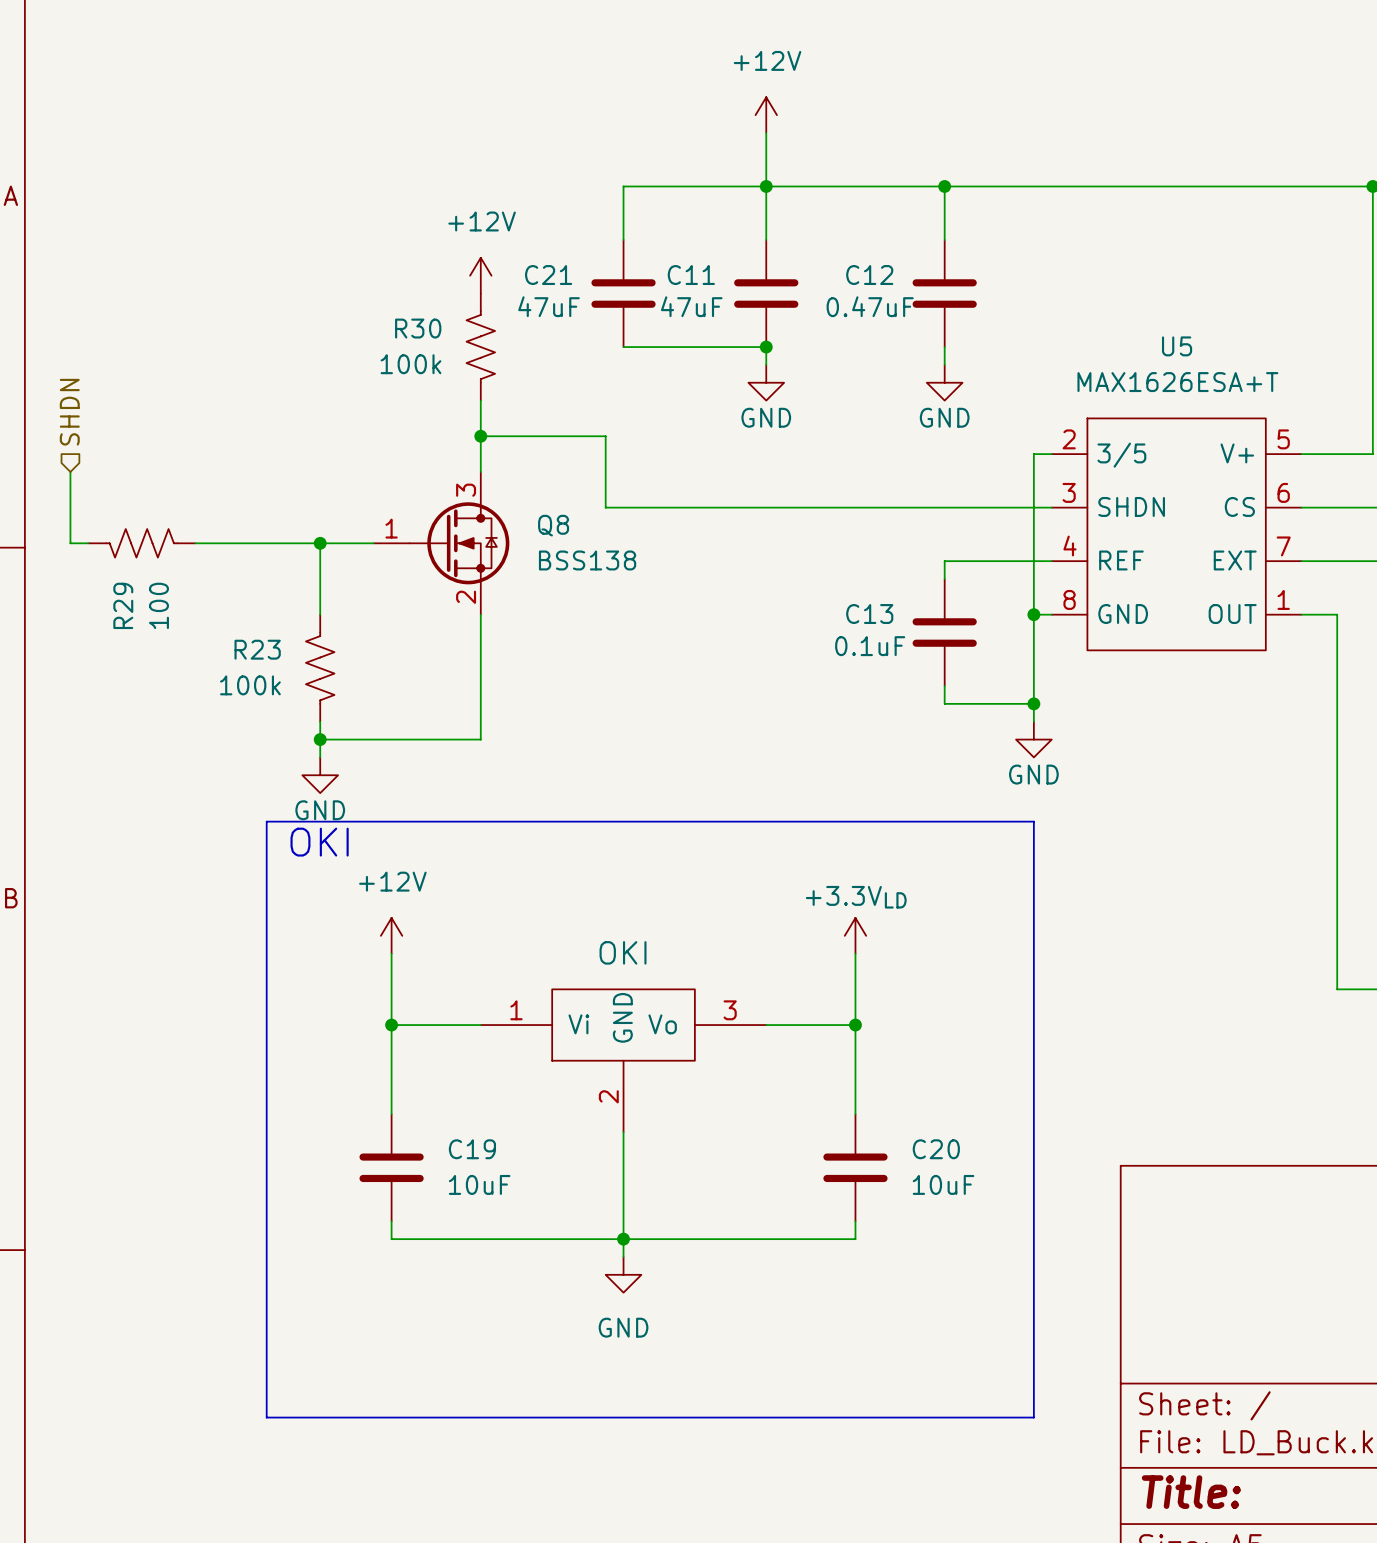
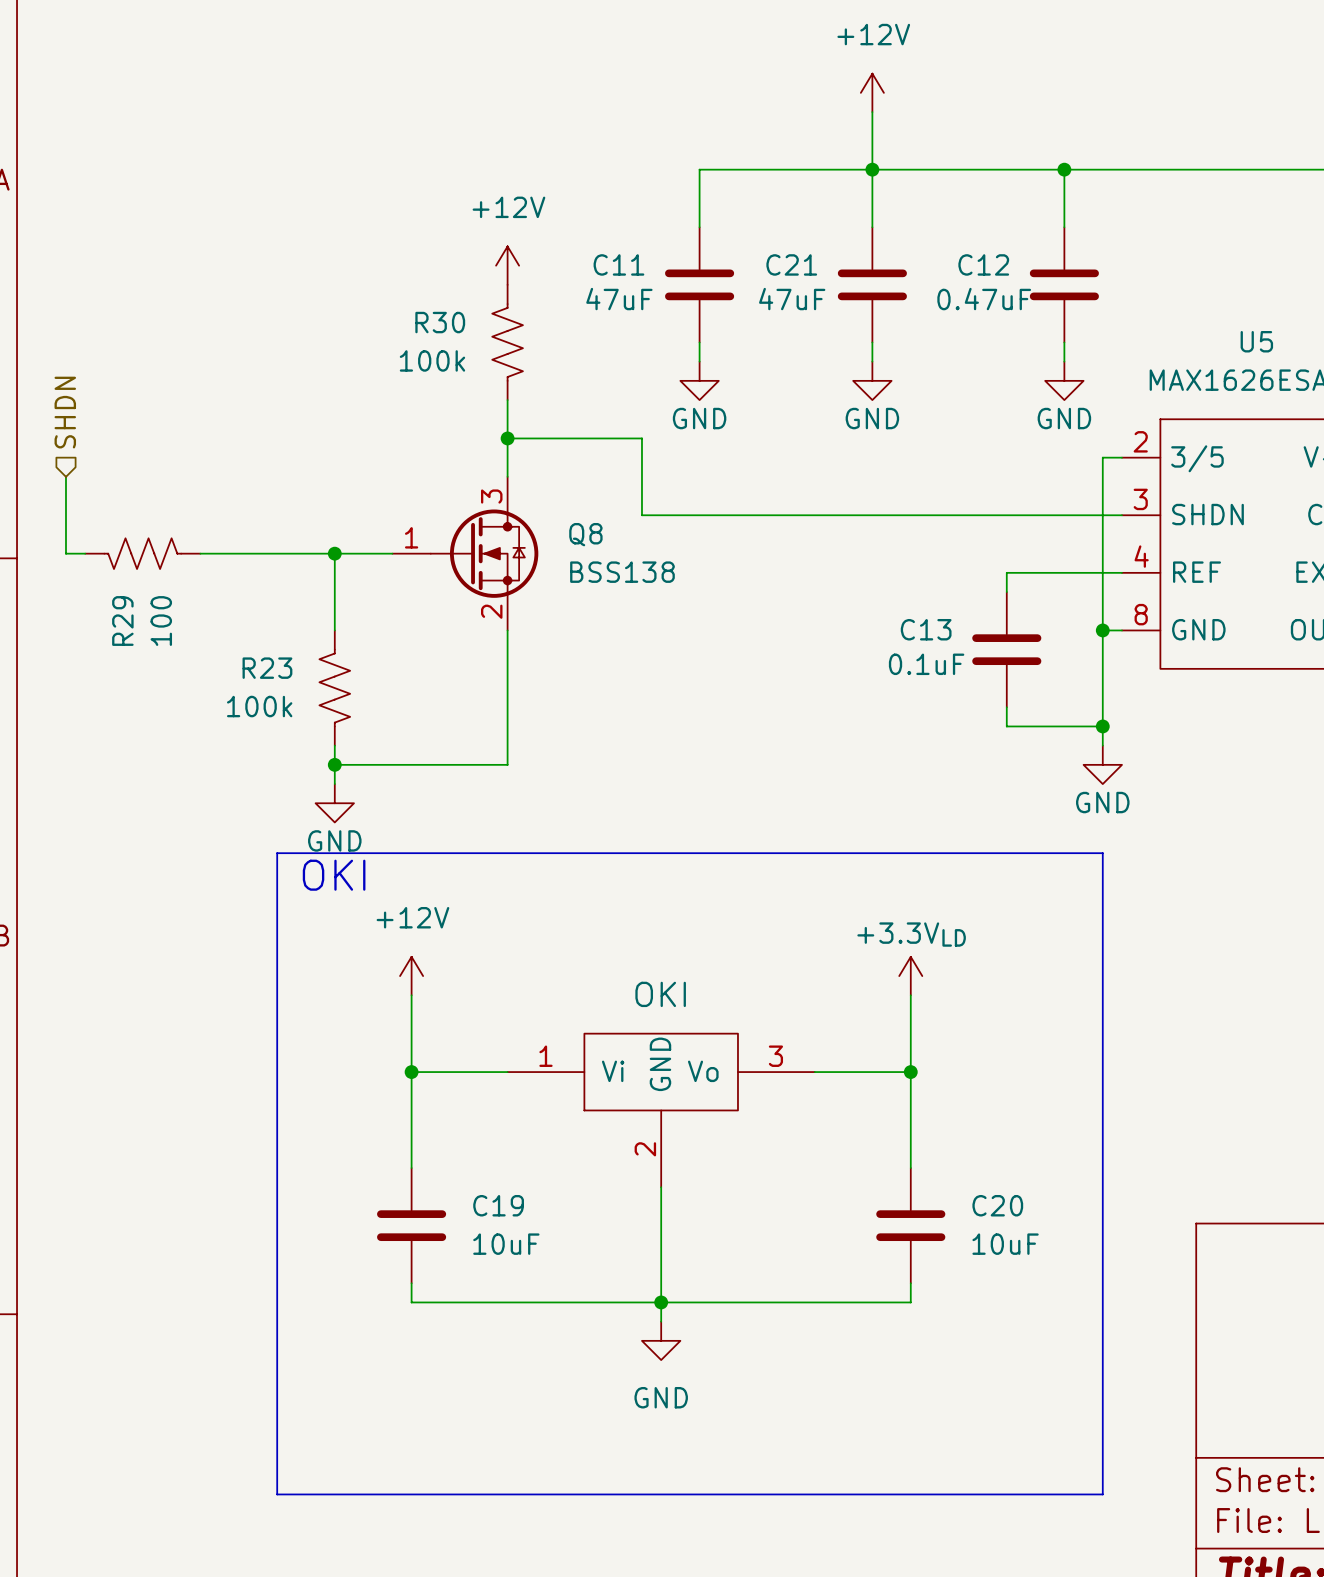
power symbol position: +12V (766, 115) -> +12V (872, 92)
wire: (766, 132) (766, 240) -> (872, 112) (872, 227)
wire: (659, 186) (623, 186) (623, 240) -> (699, 169) (699, 227)
junction position: (766, 186) -> (872, 169)
wire: (944, 186) (944, 240) -> (1064, 169) (1064, 227)
junction position: (944, 186) -> (1064, 169)
C21 position: (623, 293) -> (872, 284)
C11 position: (766, 293) -> (699, 284)
C12 position: (944, 293) -> (1064, 284)
wire: (623, 347) (766, 347) (766, 364) -> none
wire: none -> (699, 342) (699, 361)
junction: (766, 347) -> none
wire: none -> (872, 342) (872, 361)
wire: (944, 347) (944, 364) -> (1064, 342) (1064, 361)
power symbol: none -> GND (699, 380)
power symbol: GND (766, 382) -> none
power symbol: none -> GND (872, 380)
power symbol position: GND (944, 382) -> GND (1064, 380)

